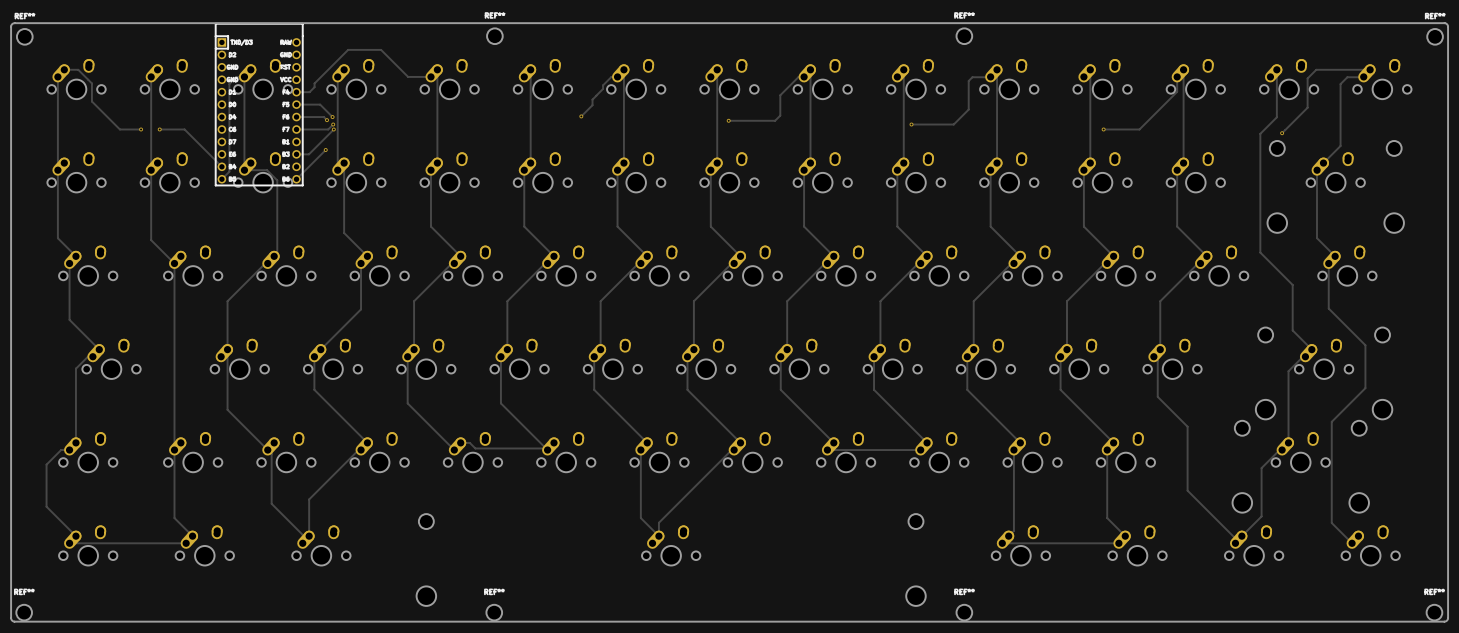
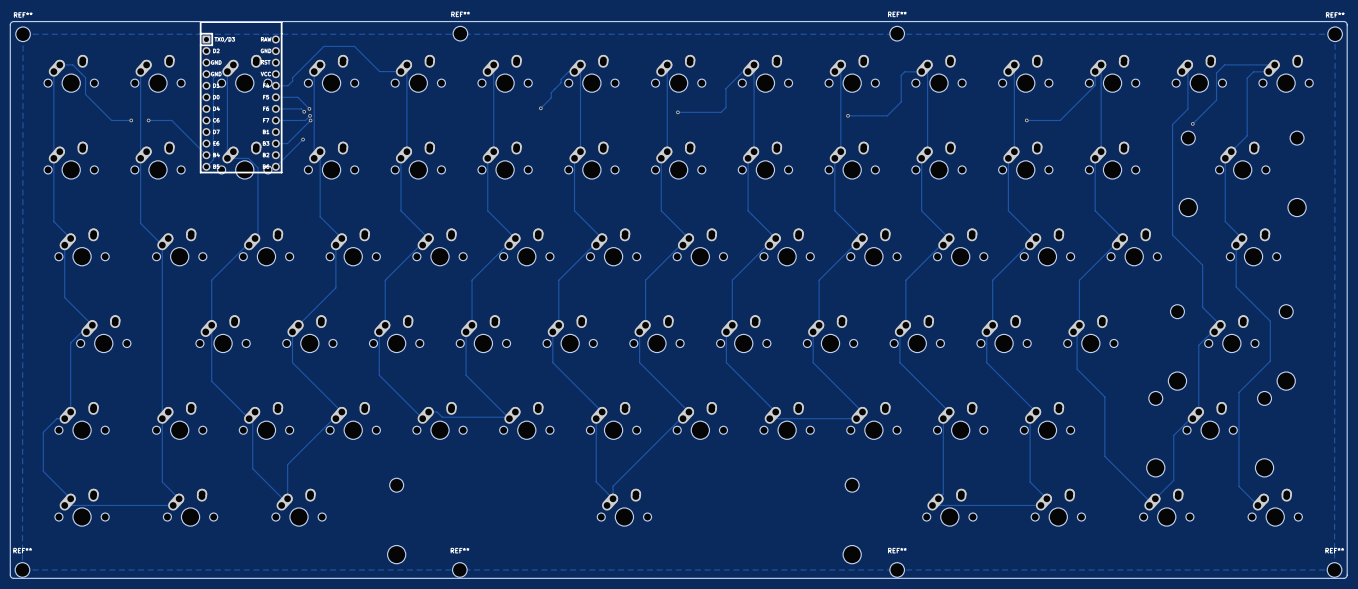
zone outline: none -> (23, 34) (22, 569) (1334, 569) (1335, 34) (23, 34)

